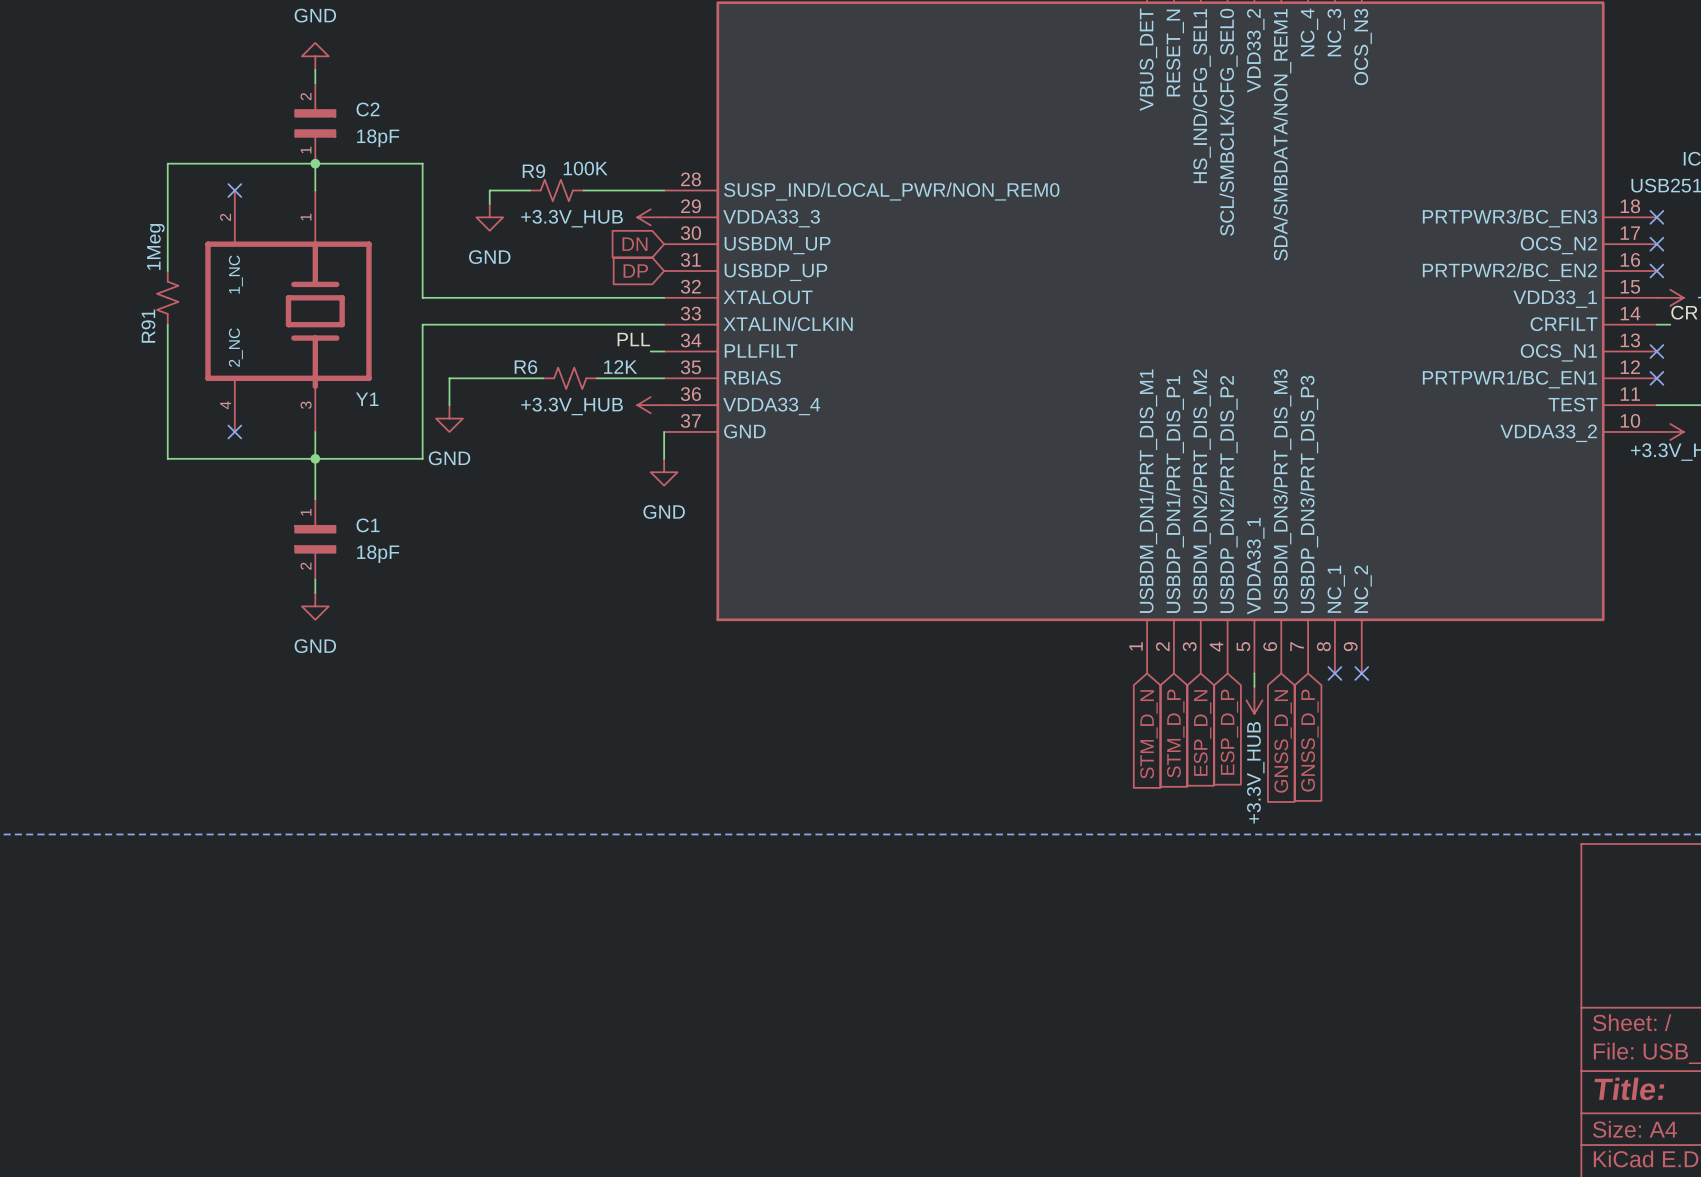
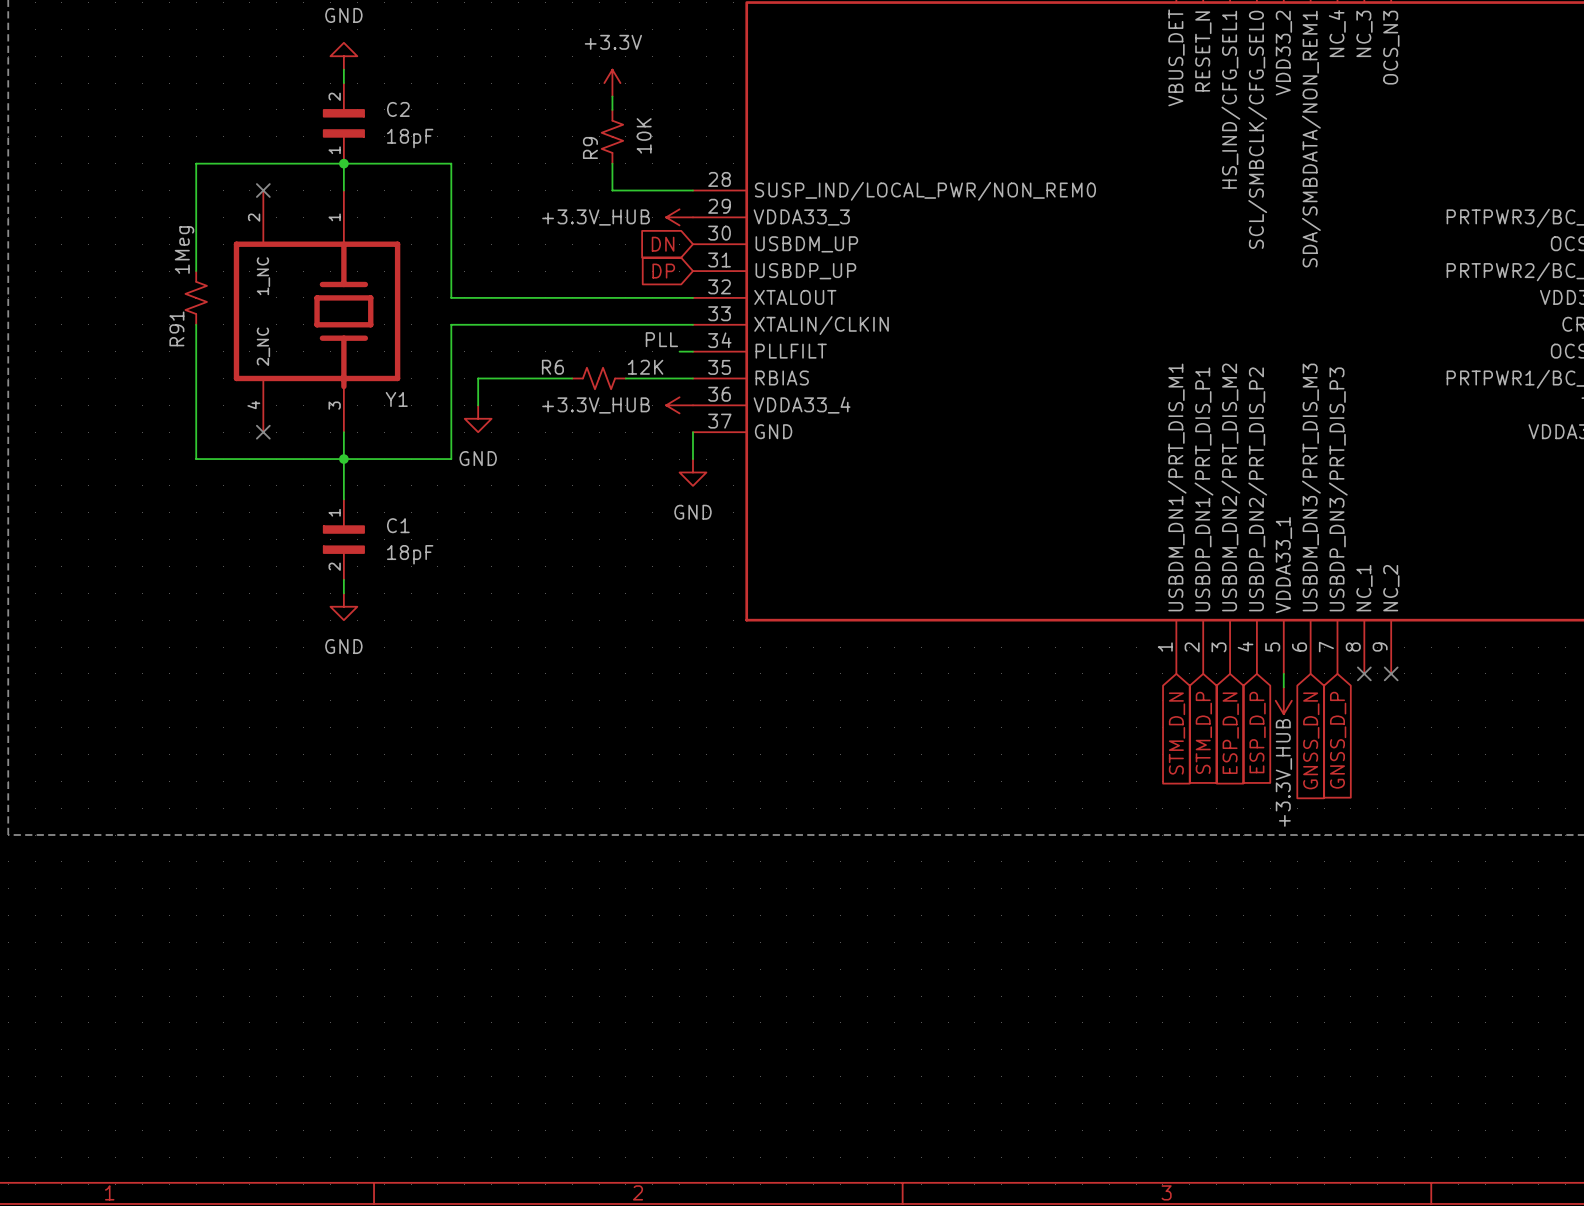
power symbol: none -> +3.3V (612, 83)
wire: none -> (612, 96) (612, 109)
wire: none -> (612, 163) (612, 190)
R9 value: 100K (585, 168) -> 10K (644, 135)
R9 name position: R9 (533, 171) -> R9 (590, 147)
wire: (529, 190) (489, 190) (489, 203) -> none
R9 rotation: 0° (556, 190) -> 90° clockwise (612, 136)
R9 position: (556, 190) -> (612, 136)
power symbol: GND (489, 217) -> none

